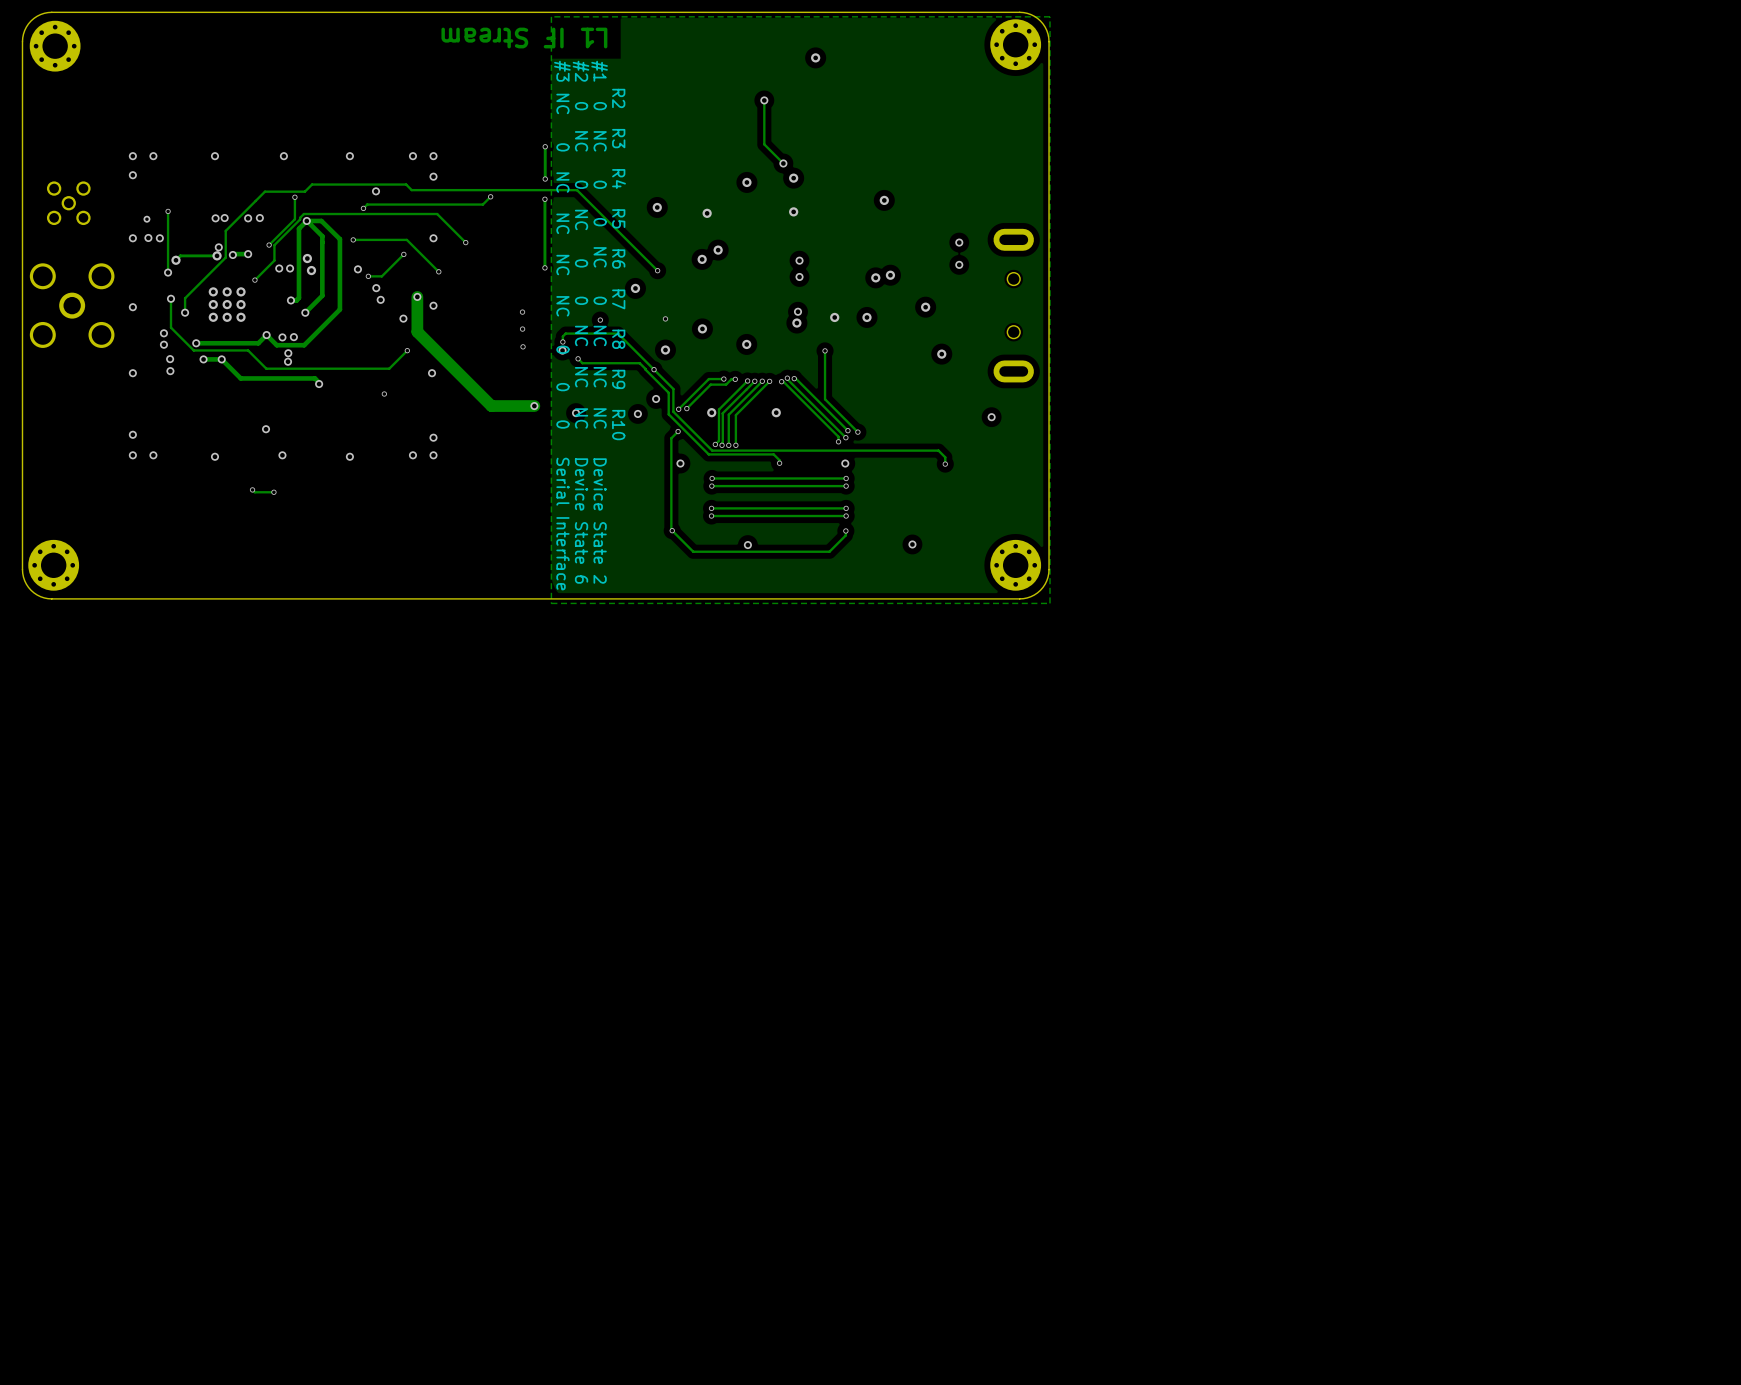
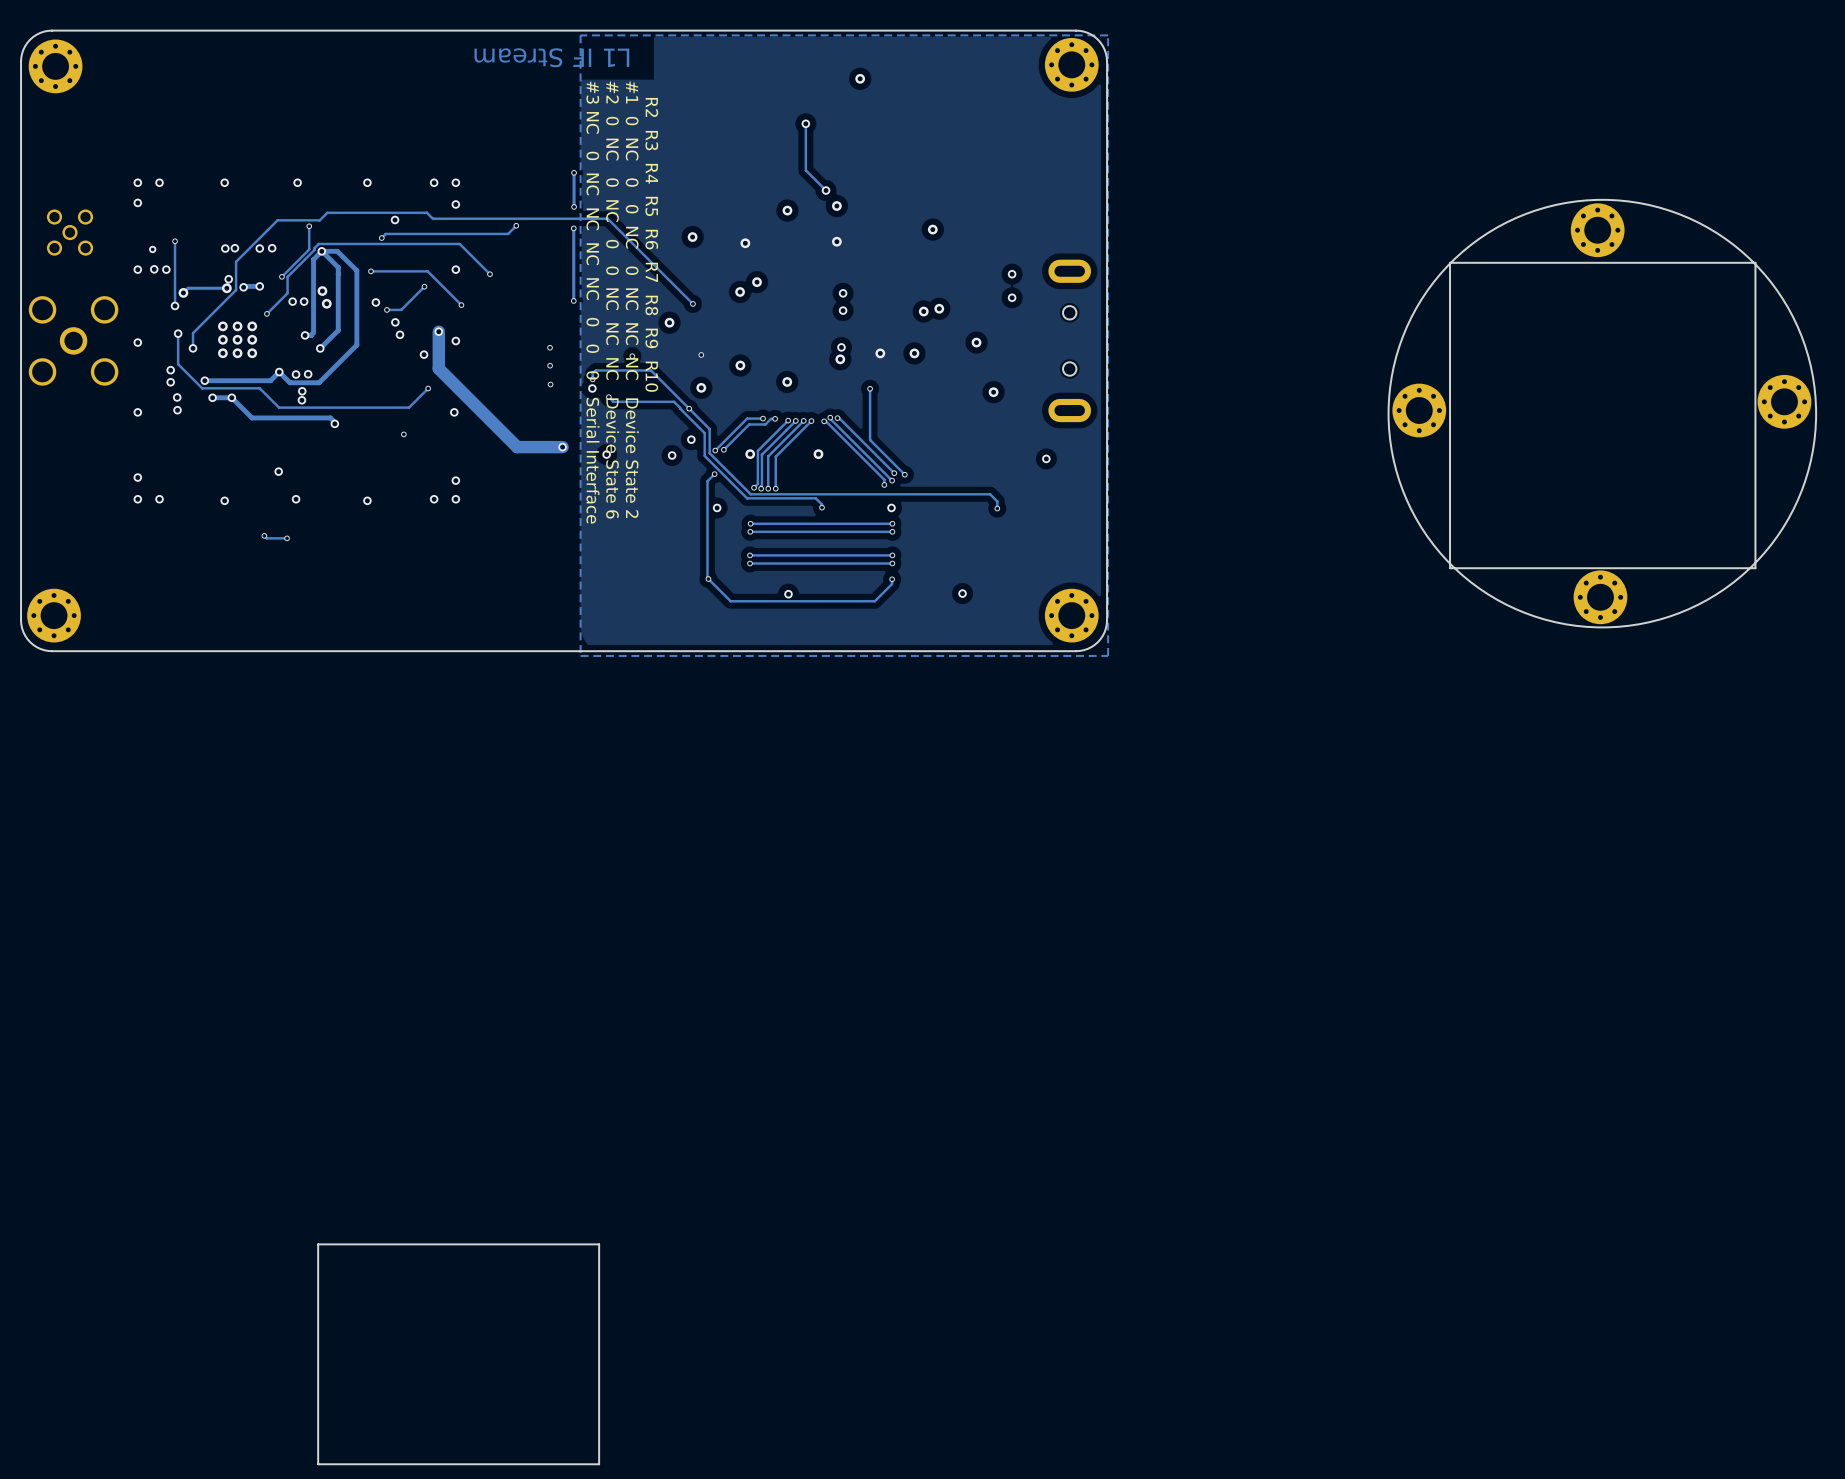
round board edge: none -> [1387, 198, 1818, 629]
part: none -> (1597, 230)
board edge: none -> (1755, 262) (1450, 262) (1450, 568) (1755, 568) (1755, 262)
part: none -> (1784, 401)
part: none -> (1419, 410)
part: none -> (1600, 597)
board edge: none -> (599, 1244) (318, 1244) (318, 1464) (599, 1464) (599, 1244)

